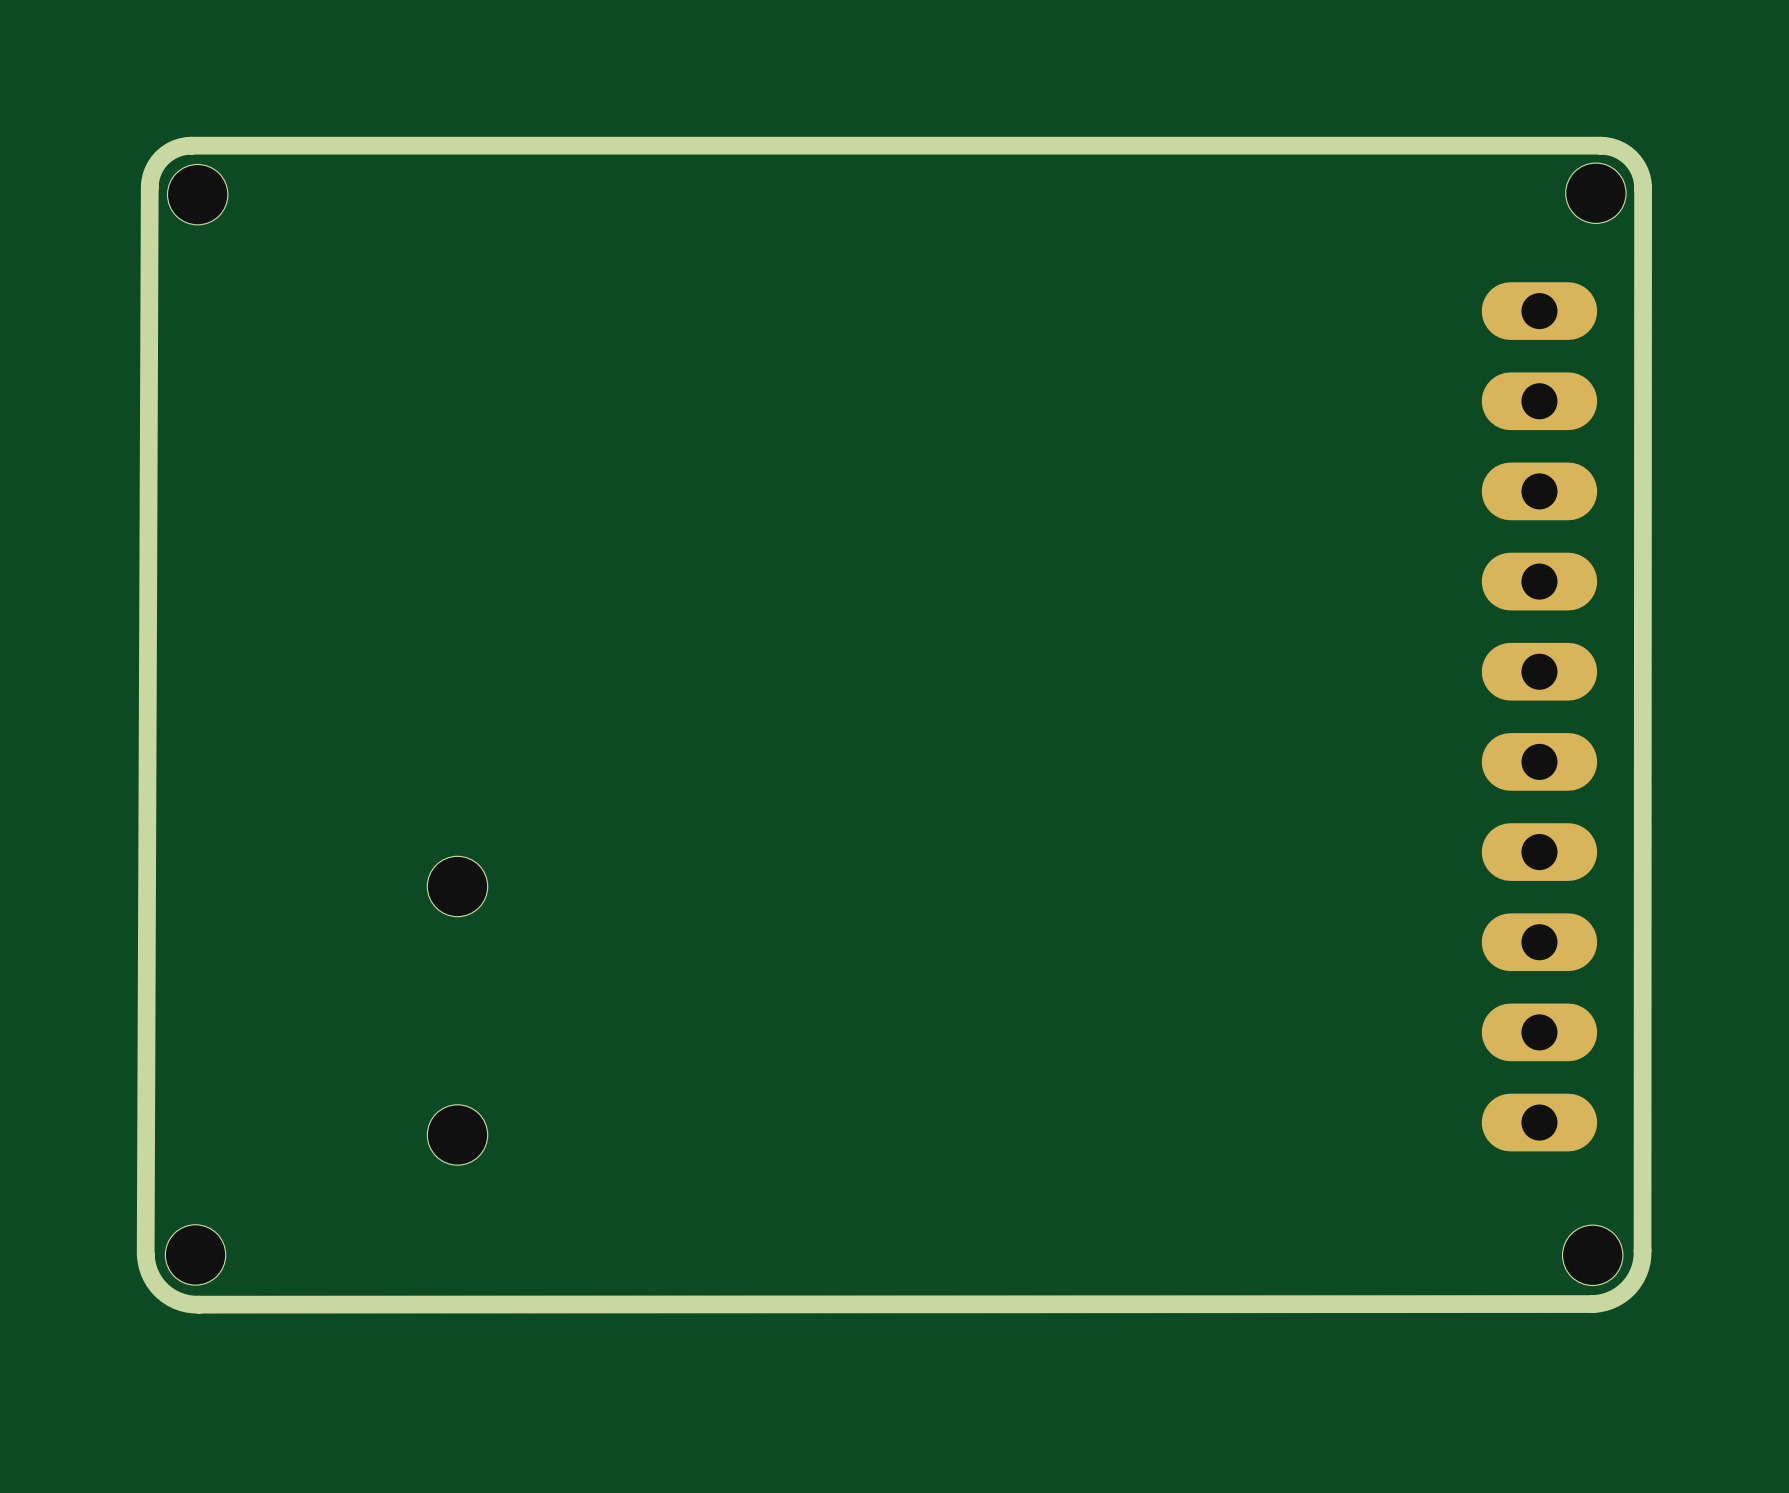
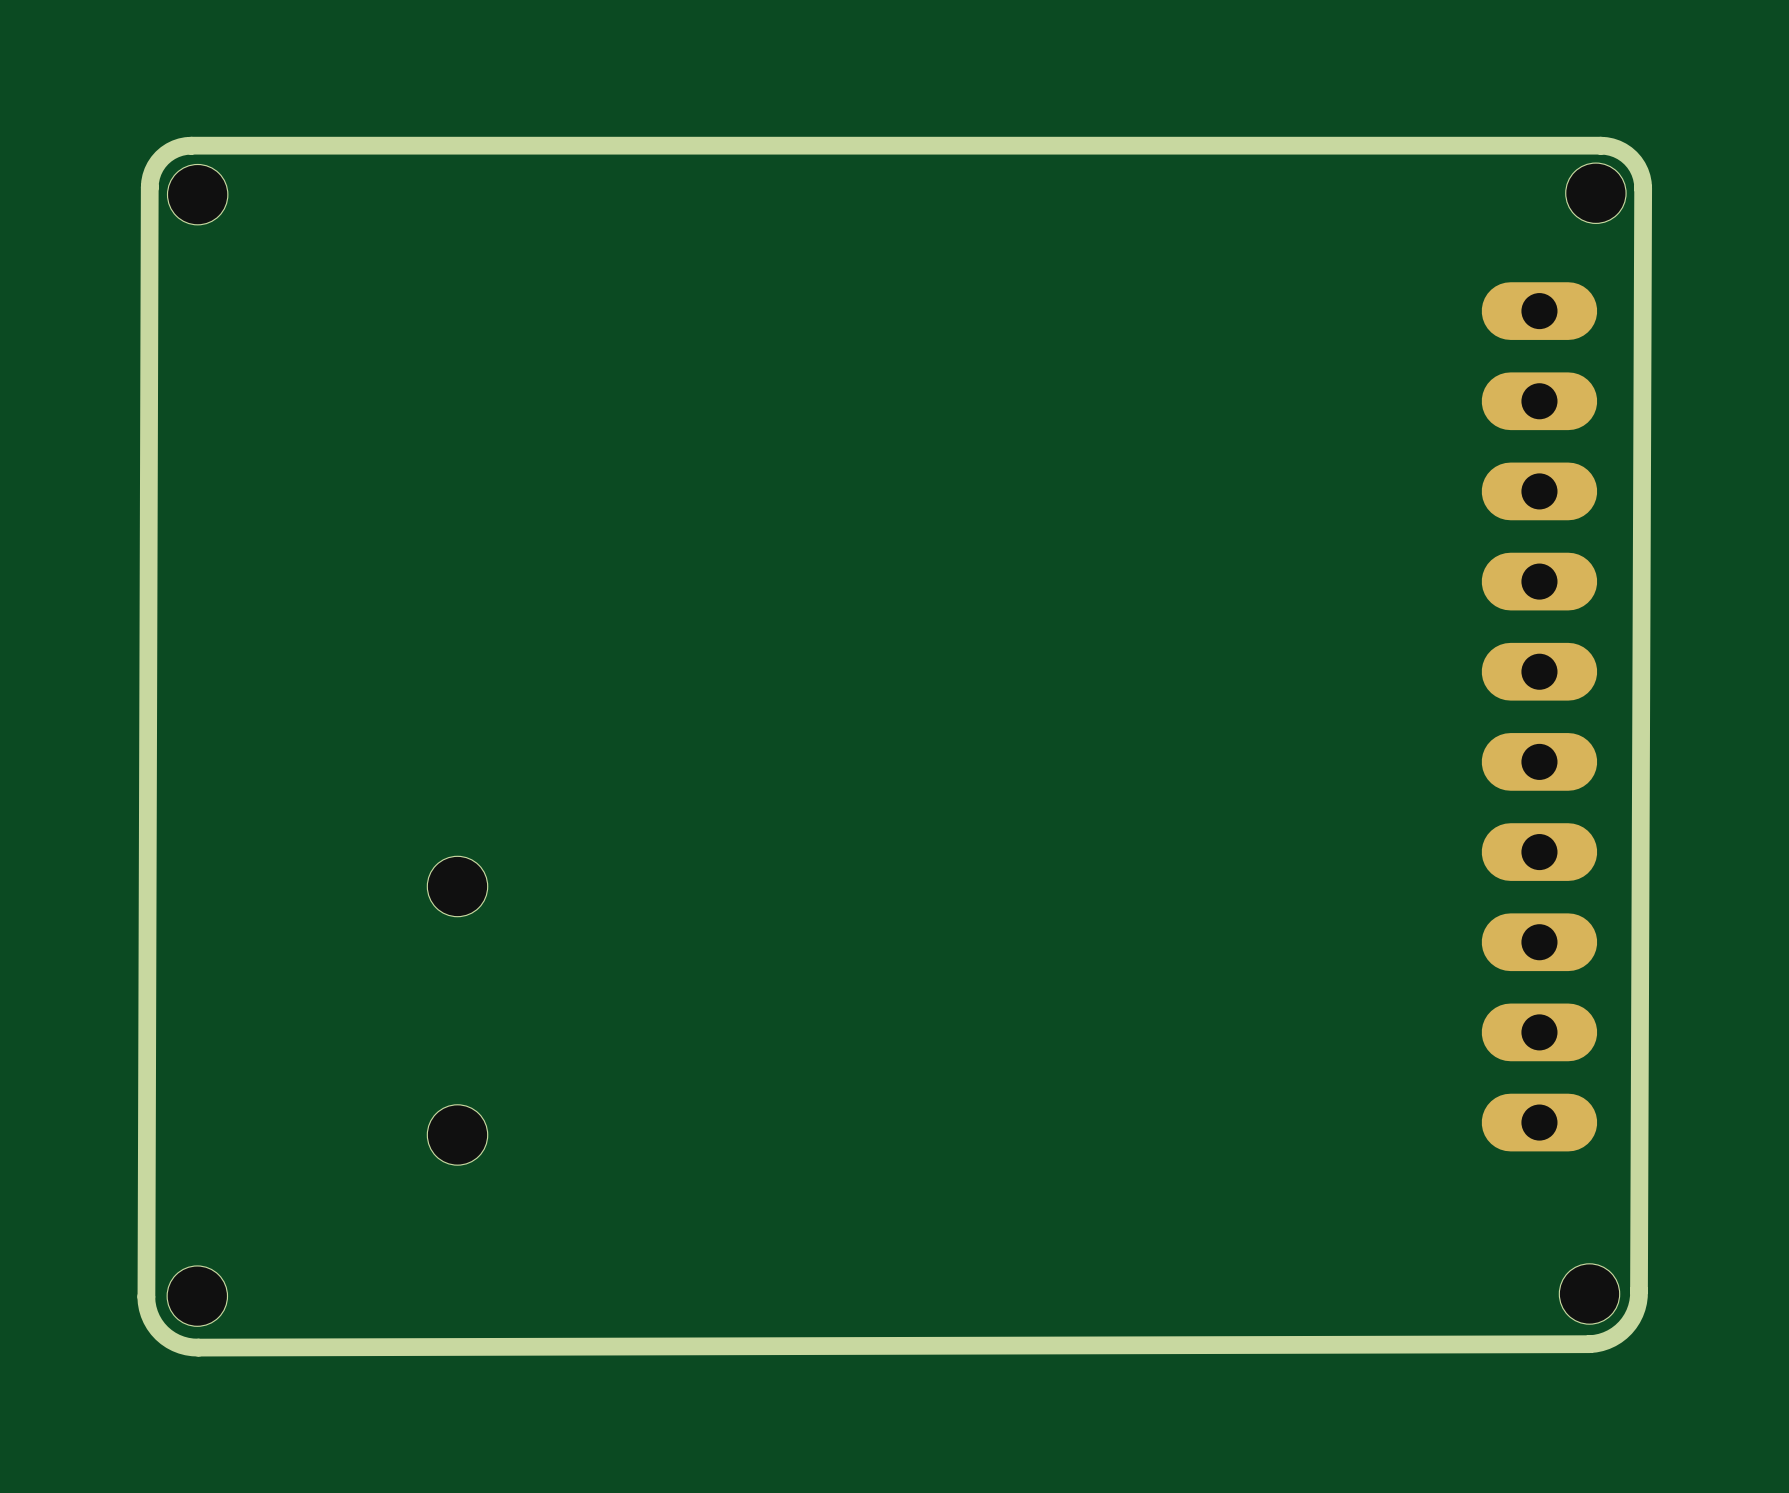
board edge: (149, 187) (145, 1255) (151, 1277) (162, 1291) (182, 1302) (199, 1304) (1593, 1304) (1609, 1300) (1624, 1291) (1635, 1278) (1642, 1256) (1643, 188) -> (146, 1296) (149, 1313) (161, 1333) (176, 1342) (198, 1347) (1589, 1344) (1600, 1342) (1616, 1335) (1632, 1318) (1638, 1296) (1643, 188)
board edge: none -> (149, 187) (146, 1296)
part position: (195, 1254) -> (197, 1296)
part position: (1592, 1255) -> (1589, 1294)

